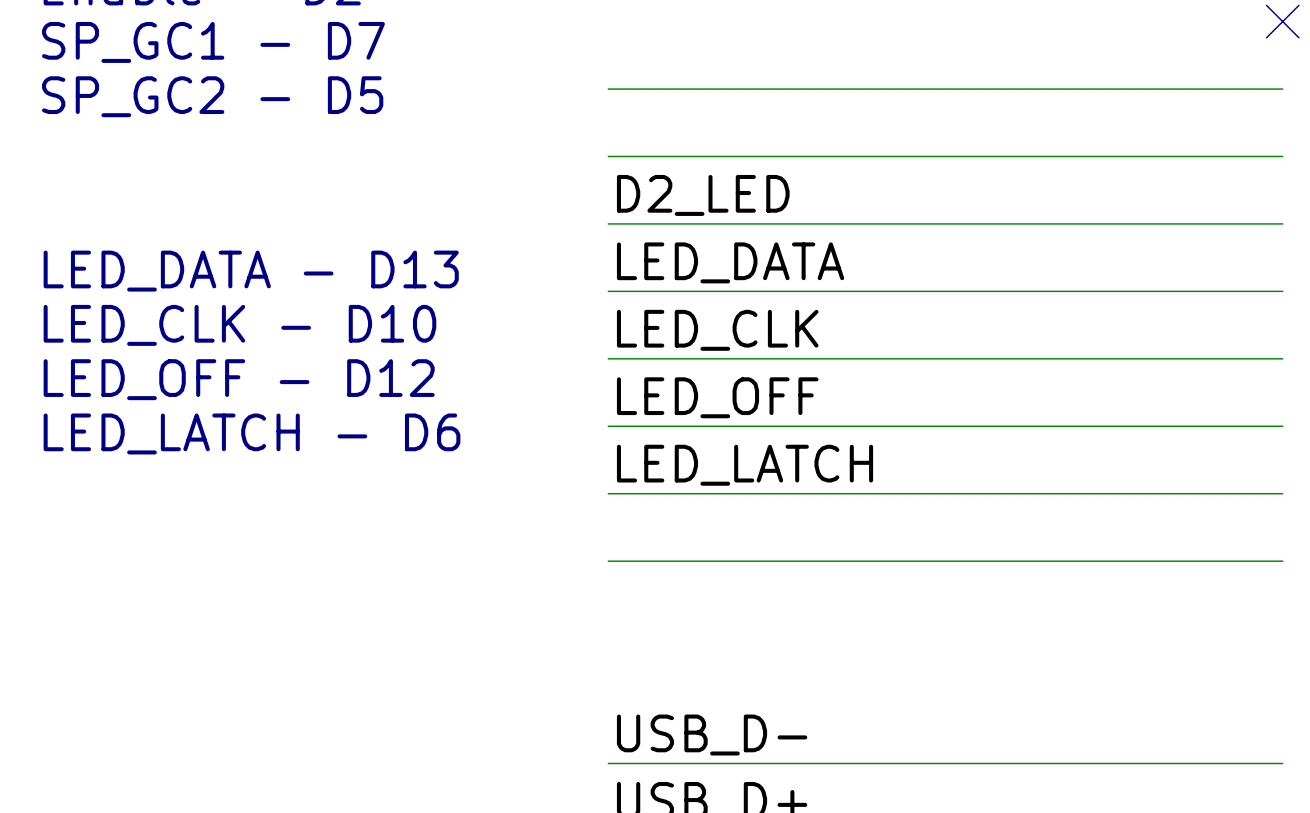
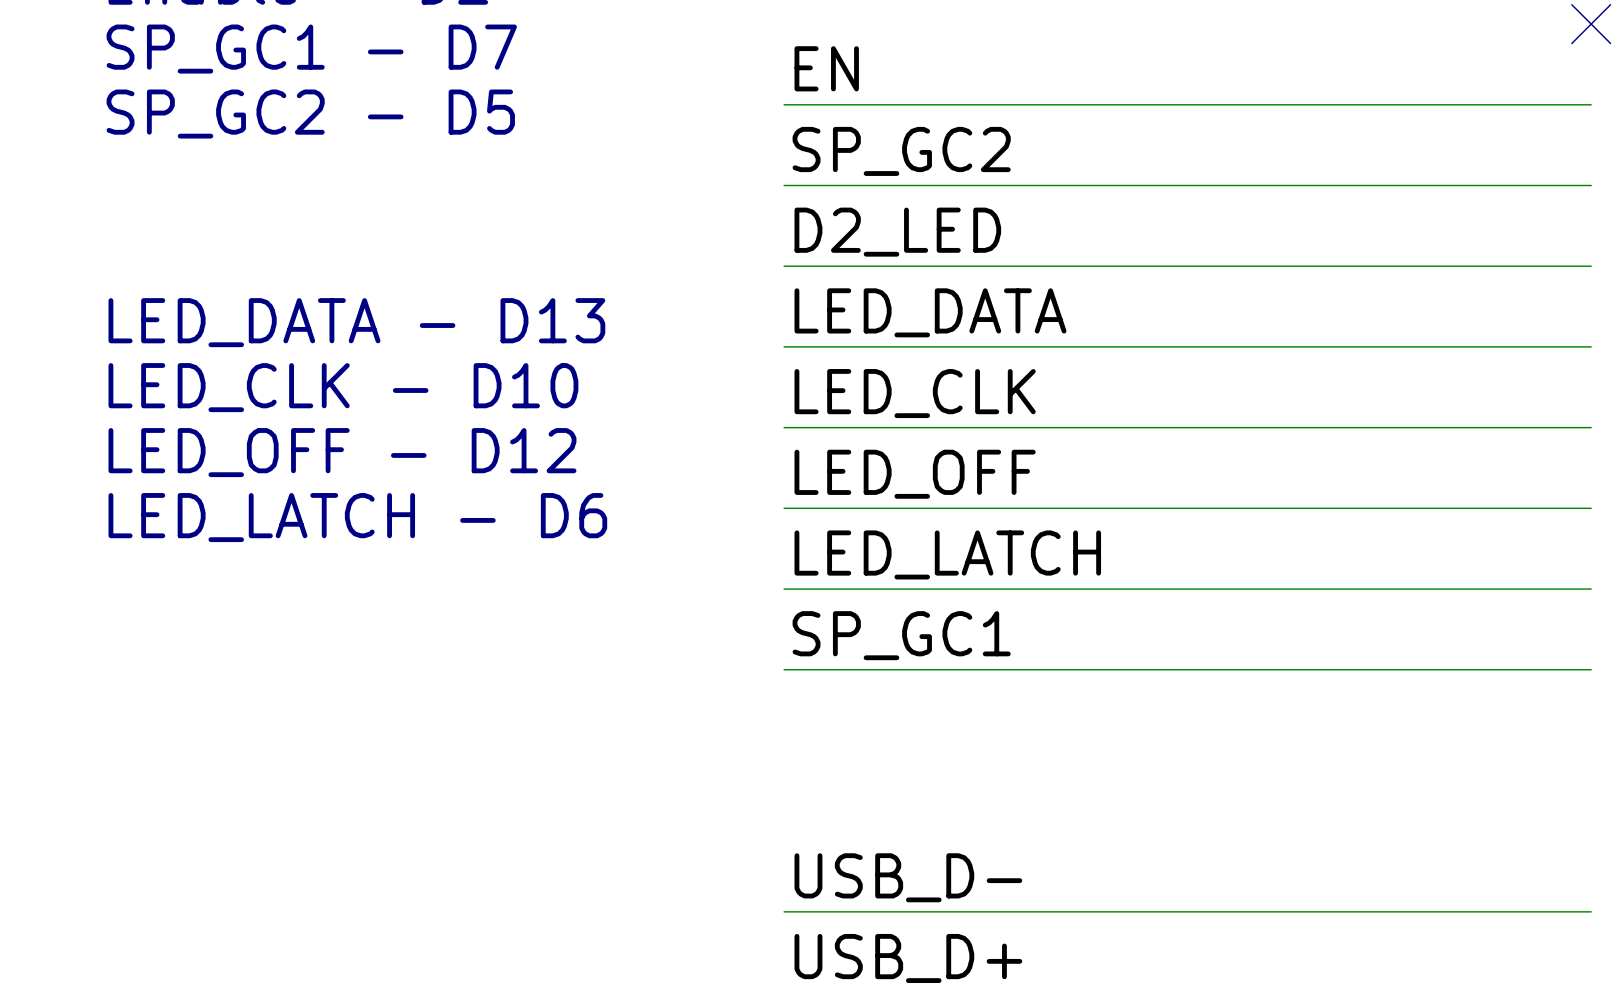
label: none -> EN (826, 68)
label: none -> SP_GC2 (901, 151)
label: none -> SP_GC1 (901, 635)

